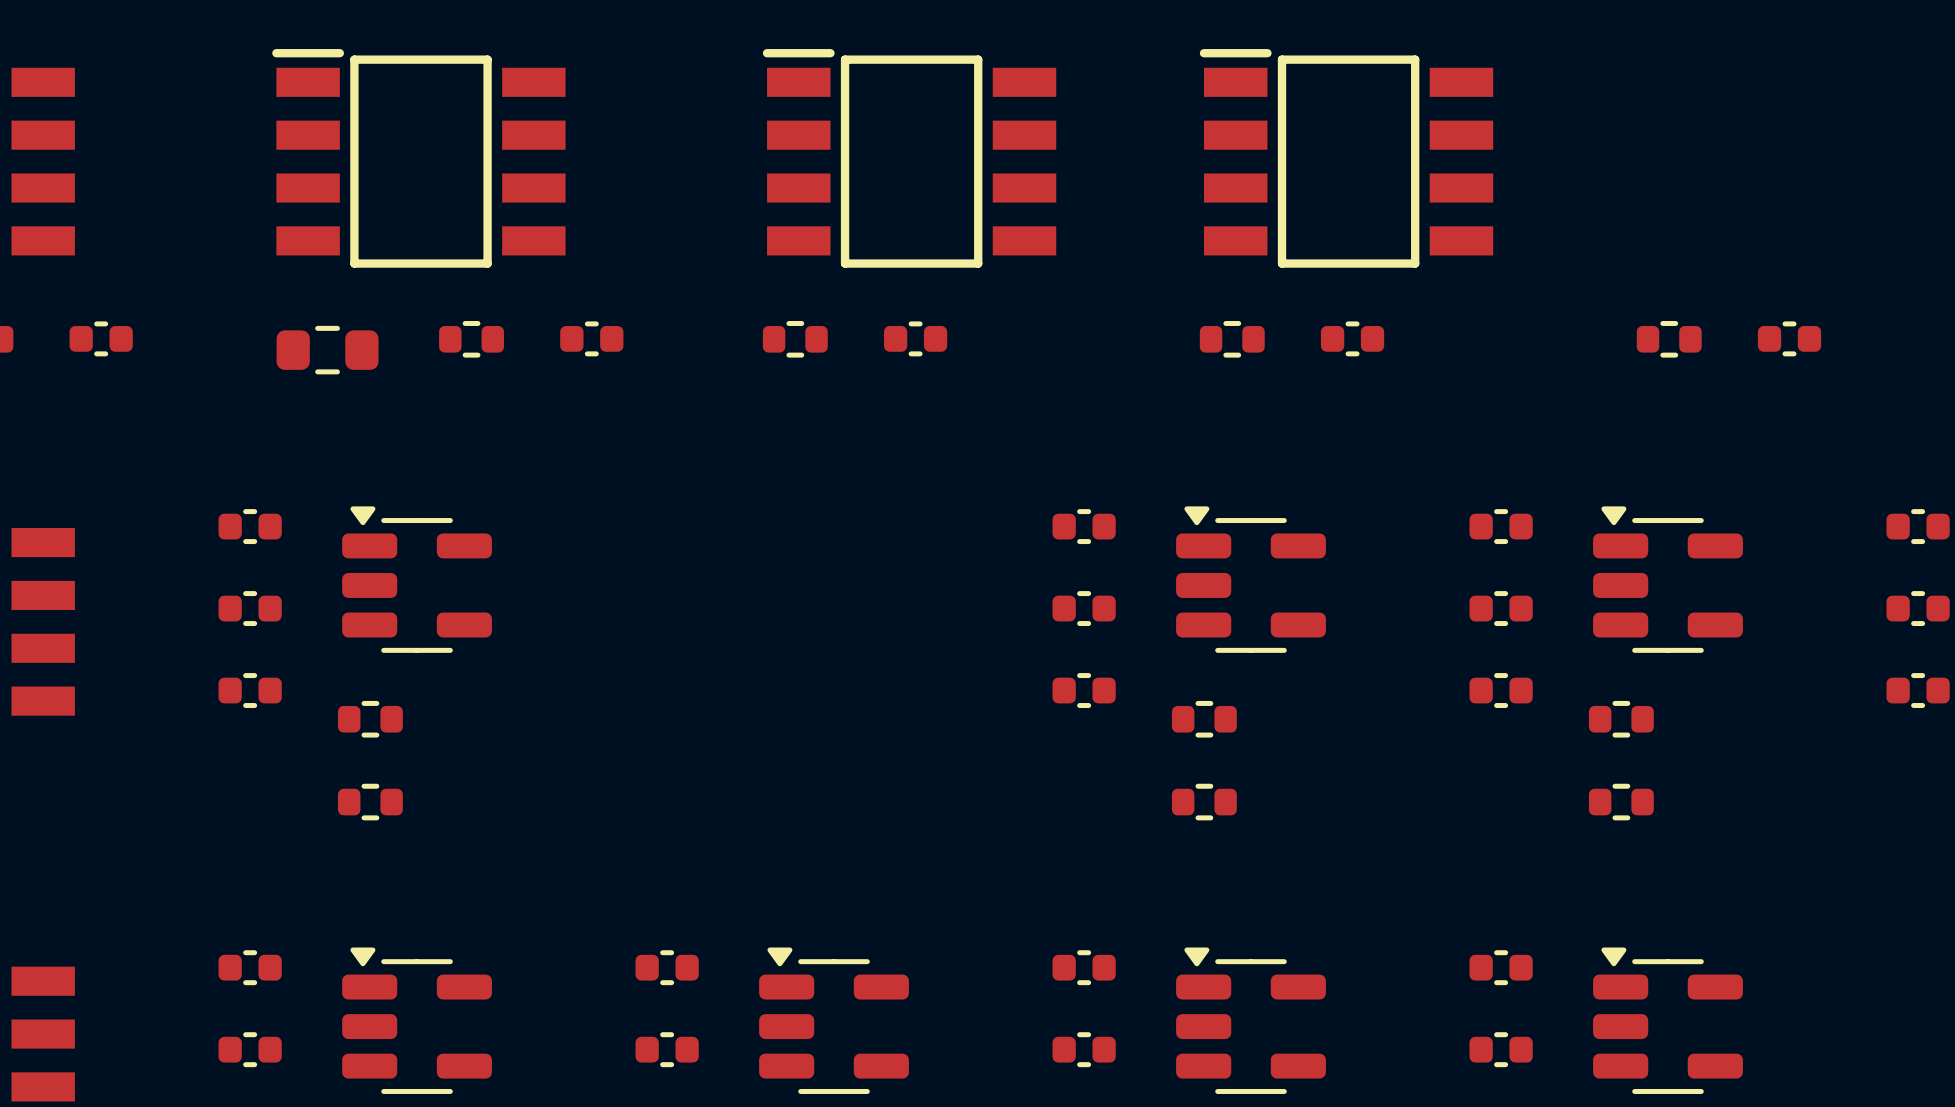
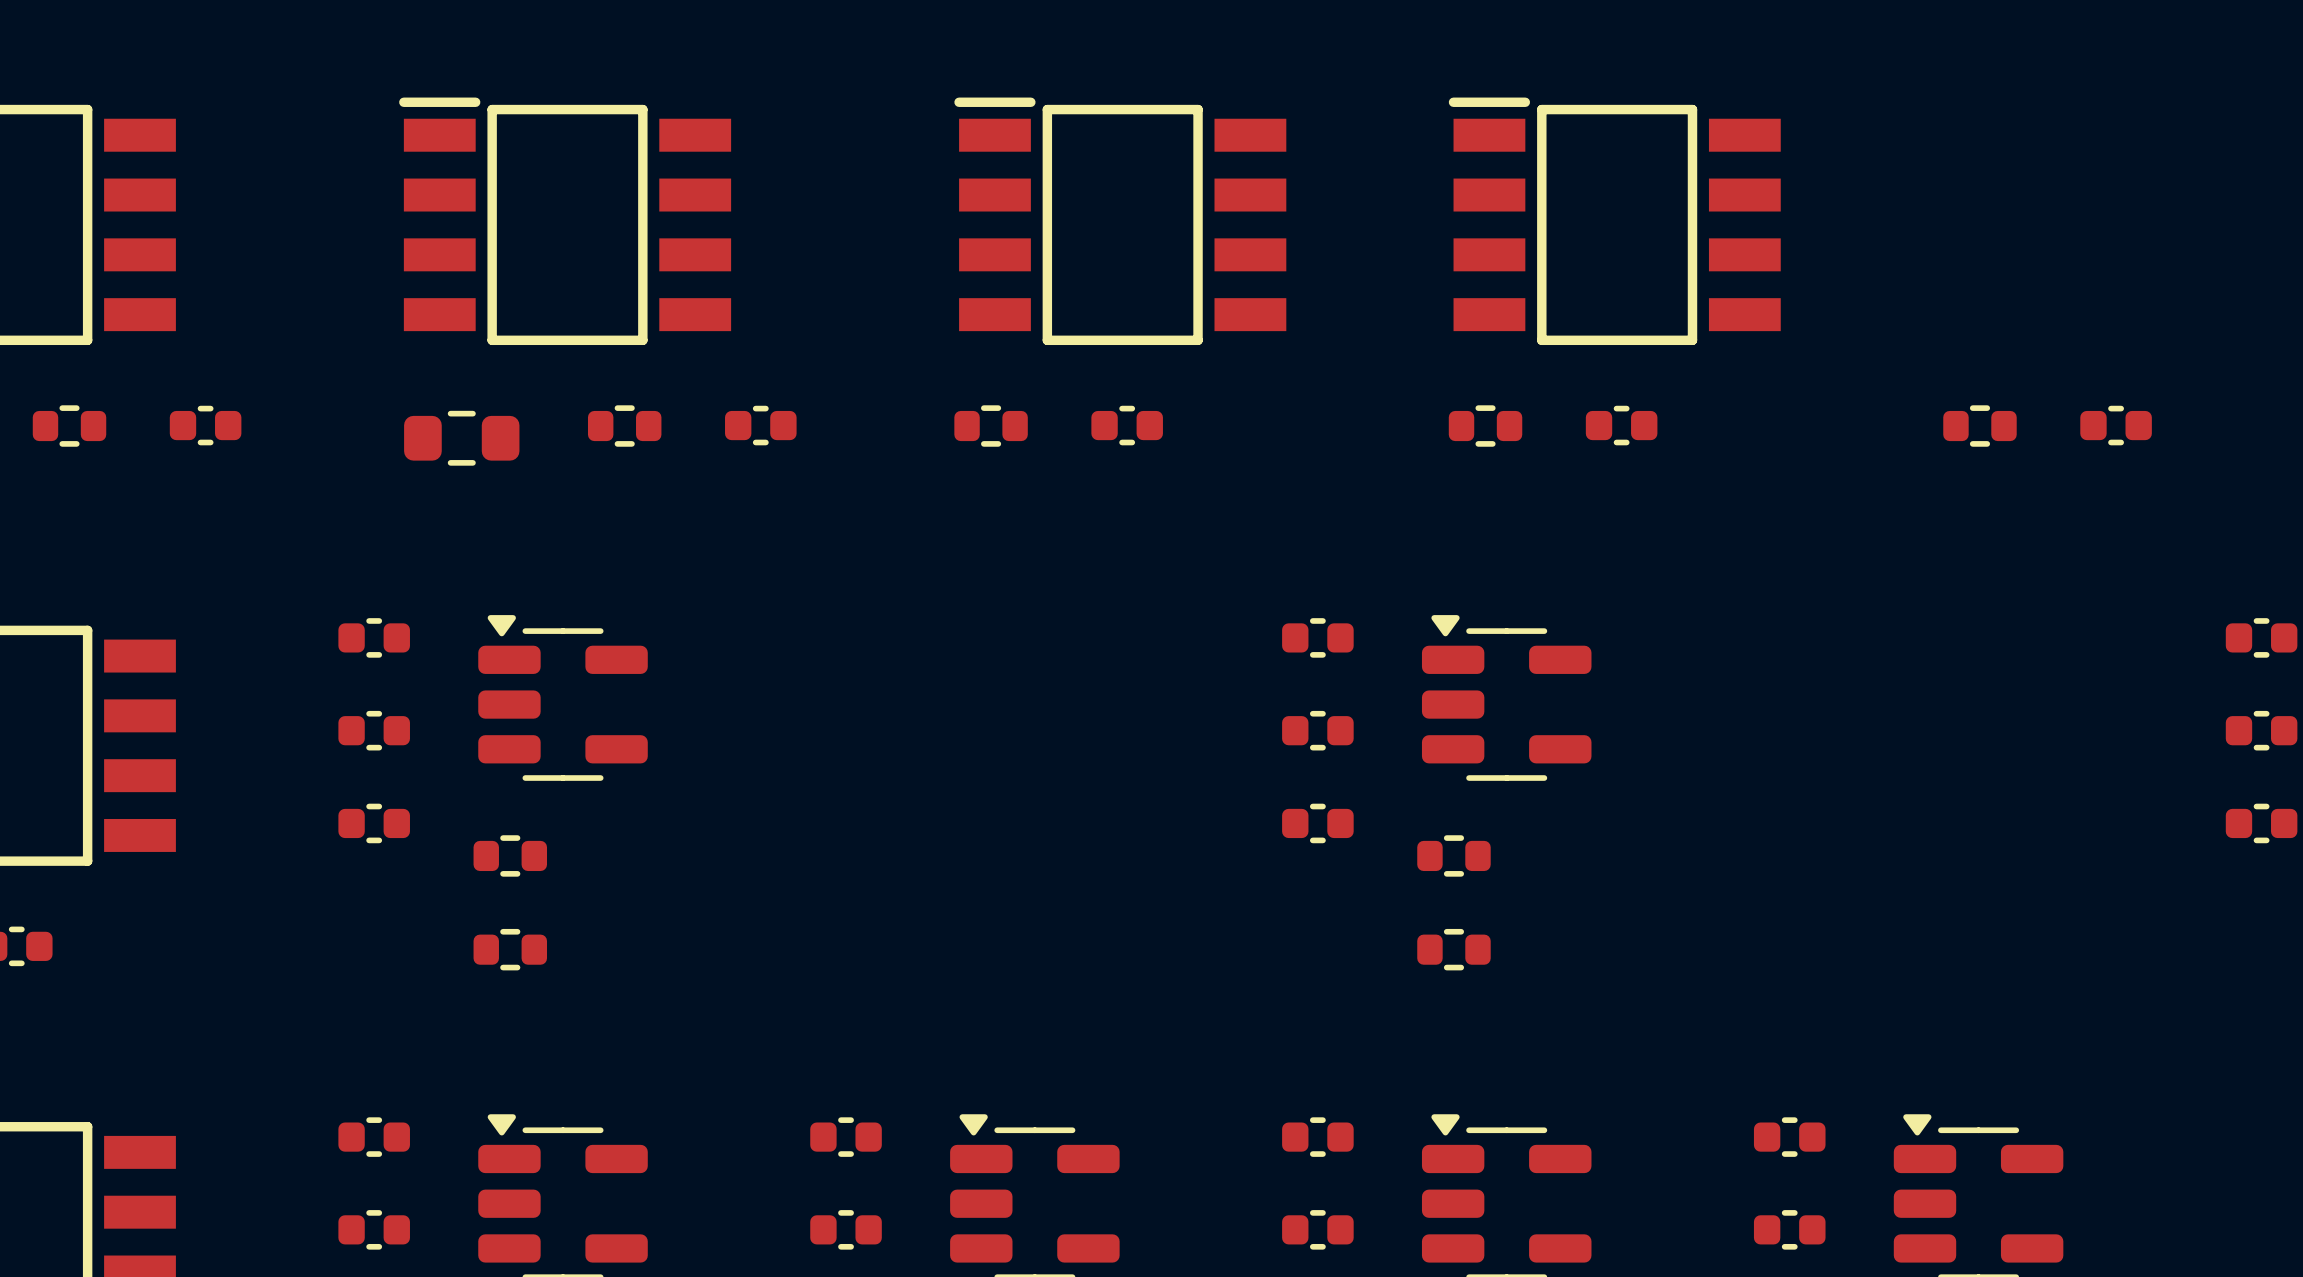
part: (1501, 526) -> none
part: (1667, 579) -> none
part: (1501, 608) -> none
part: (1501, 690) -> none
part: (1621, 719) -> none
part: (1621, 802) -> none

